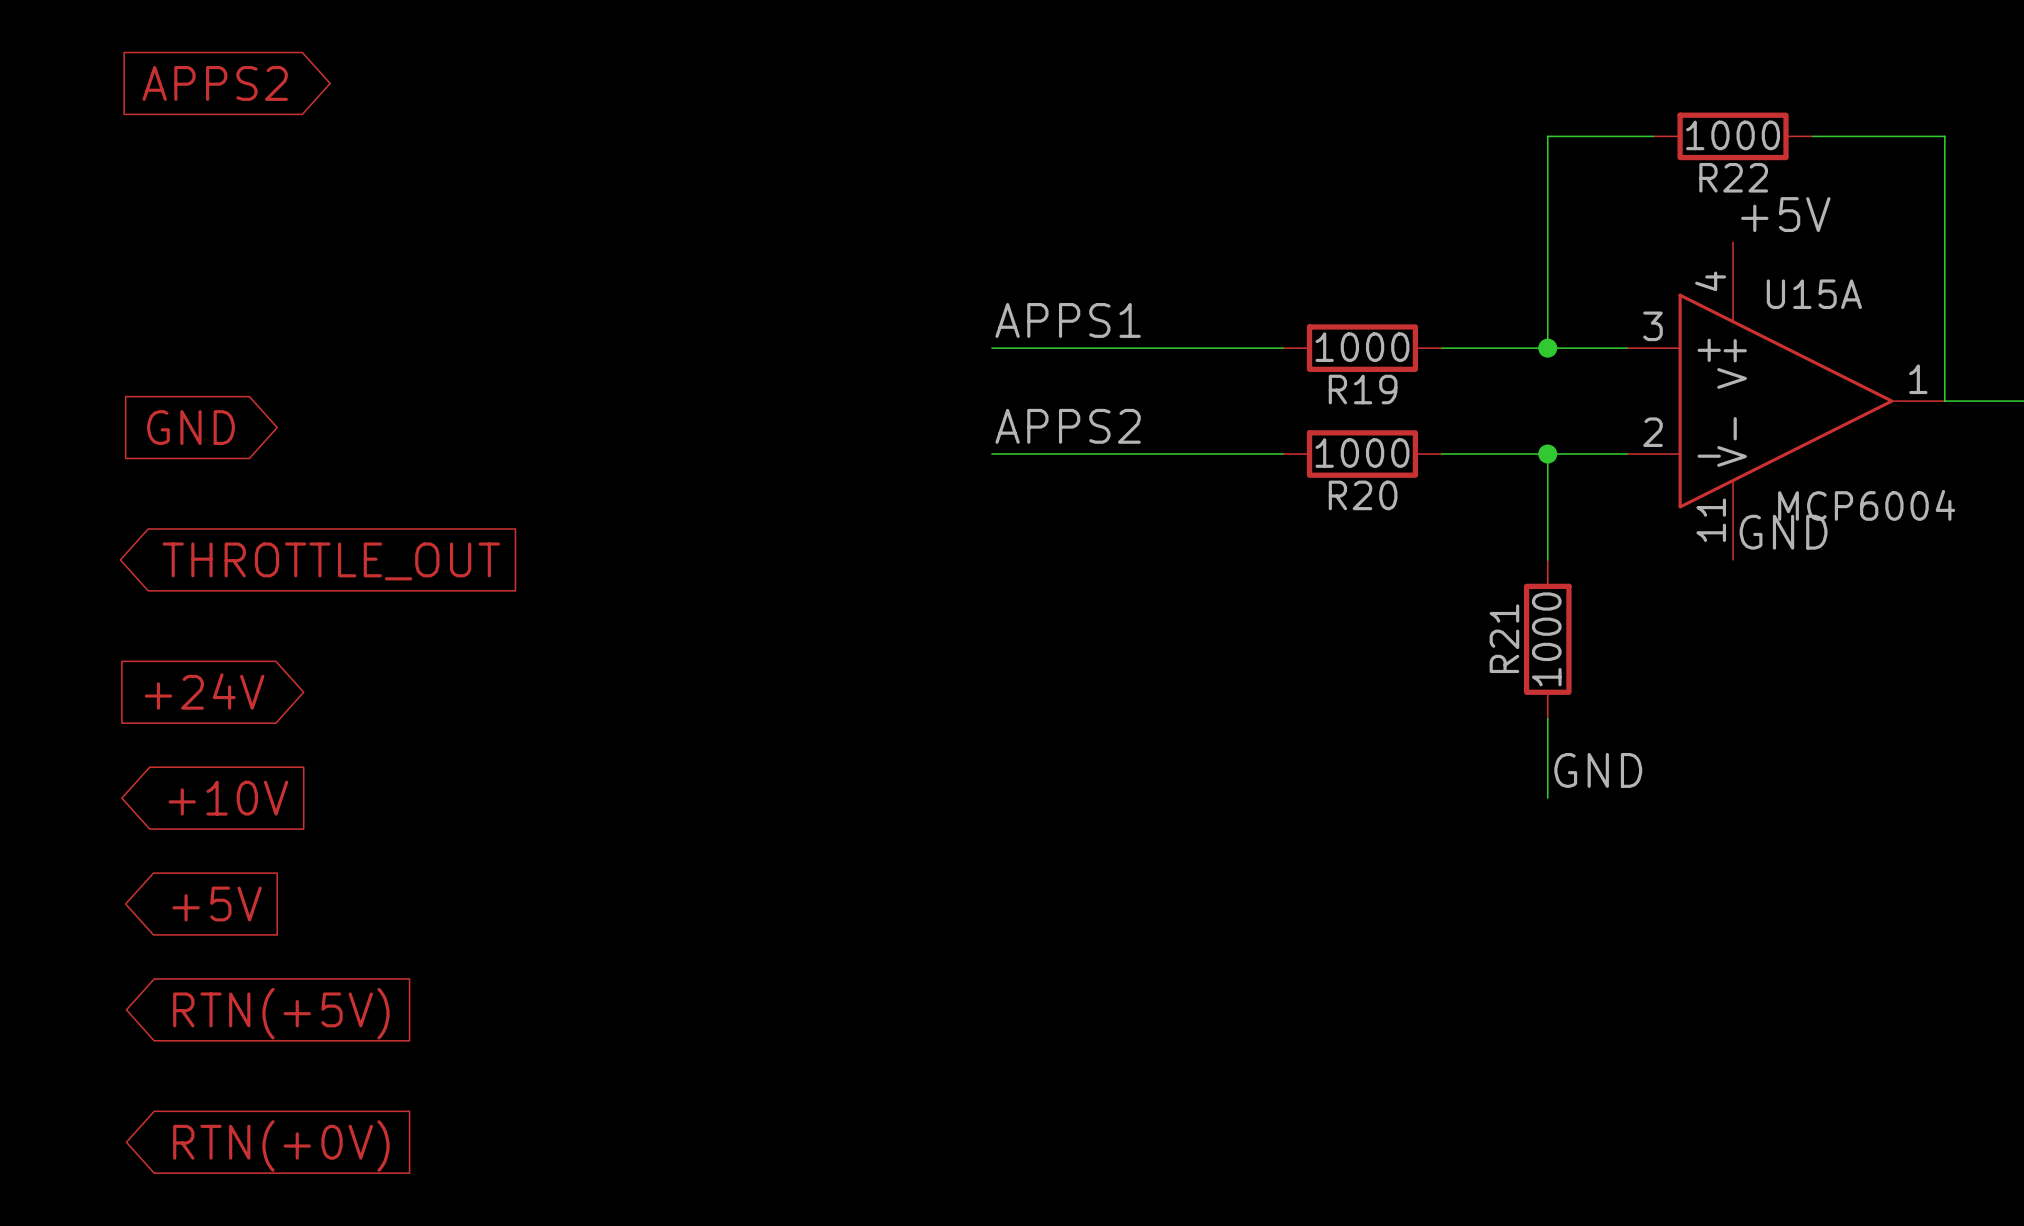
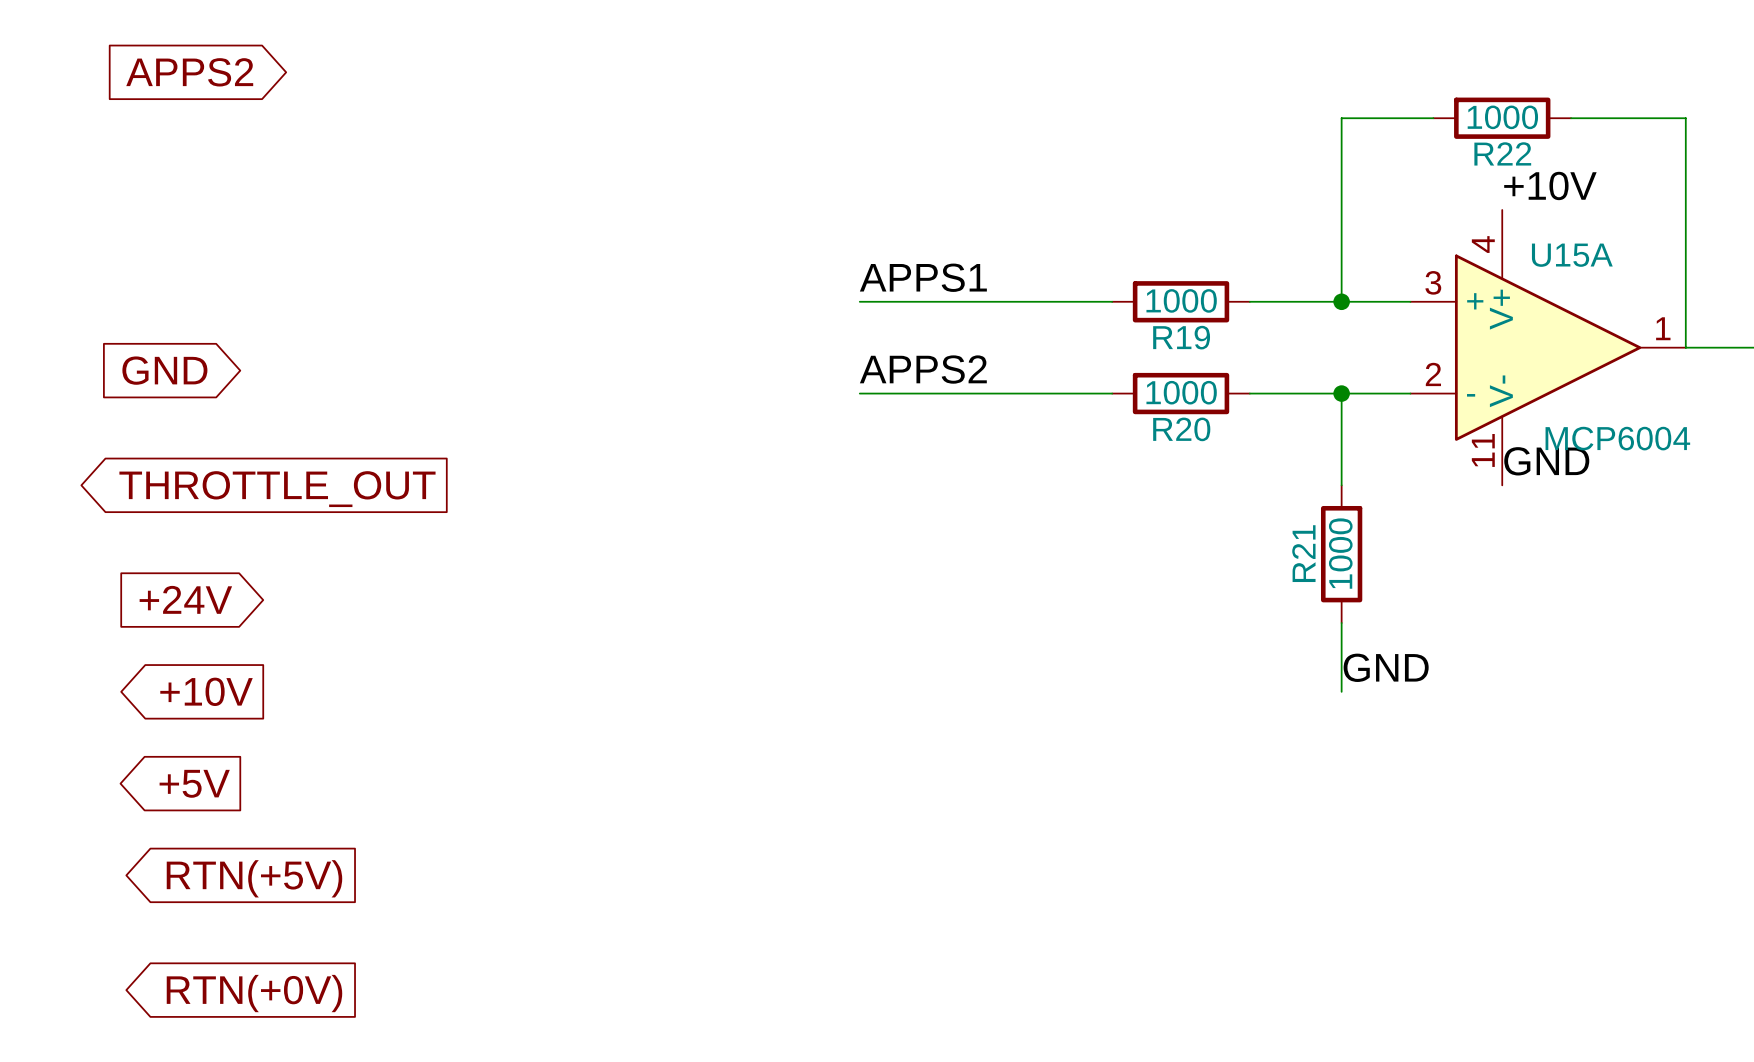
label: +5V (1785, 214) -> +10V (1550, 185)

